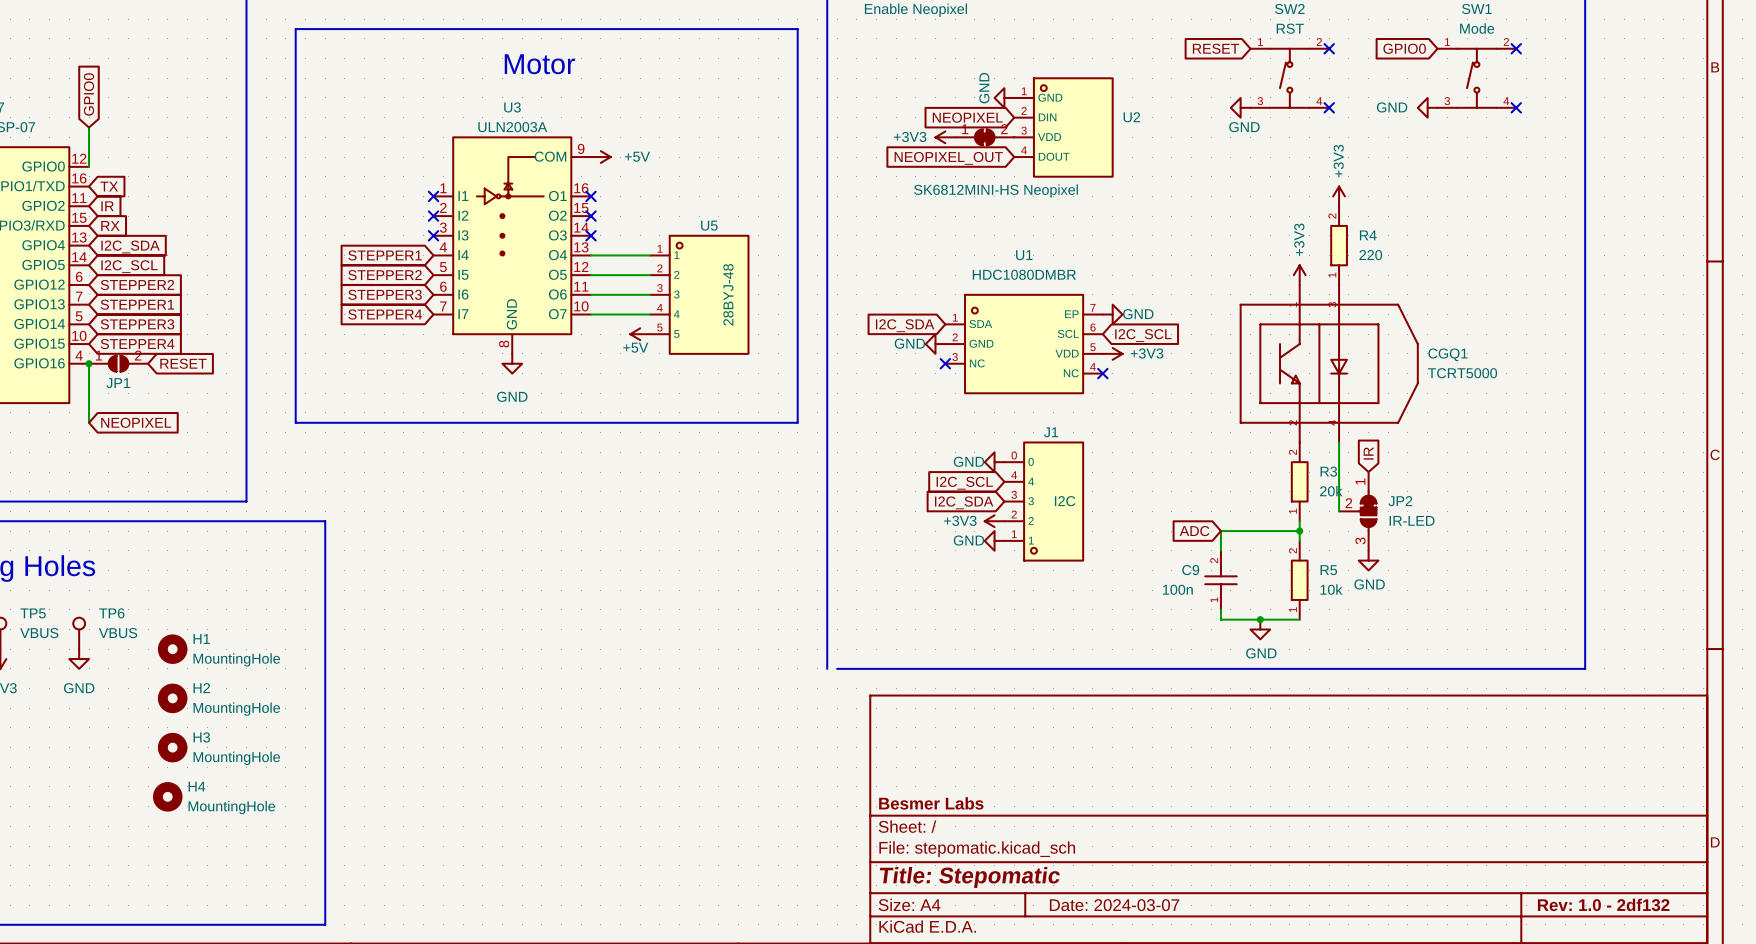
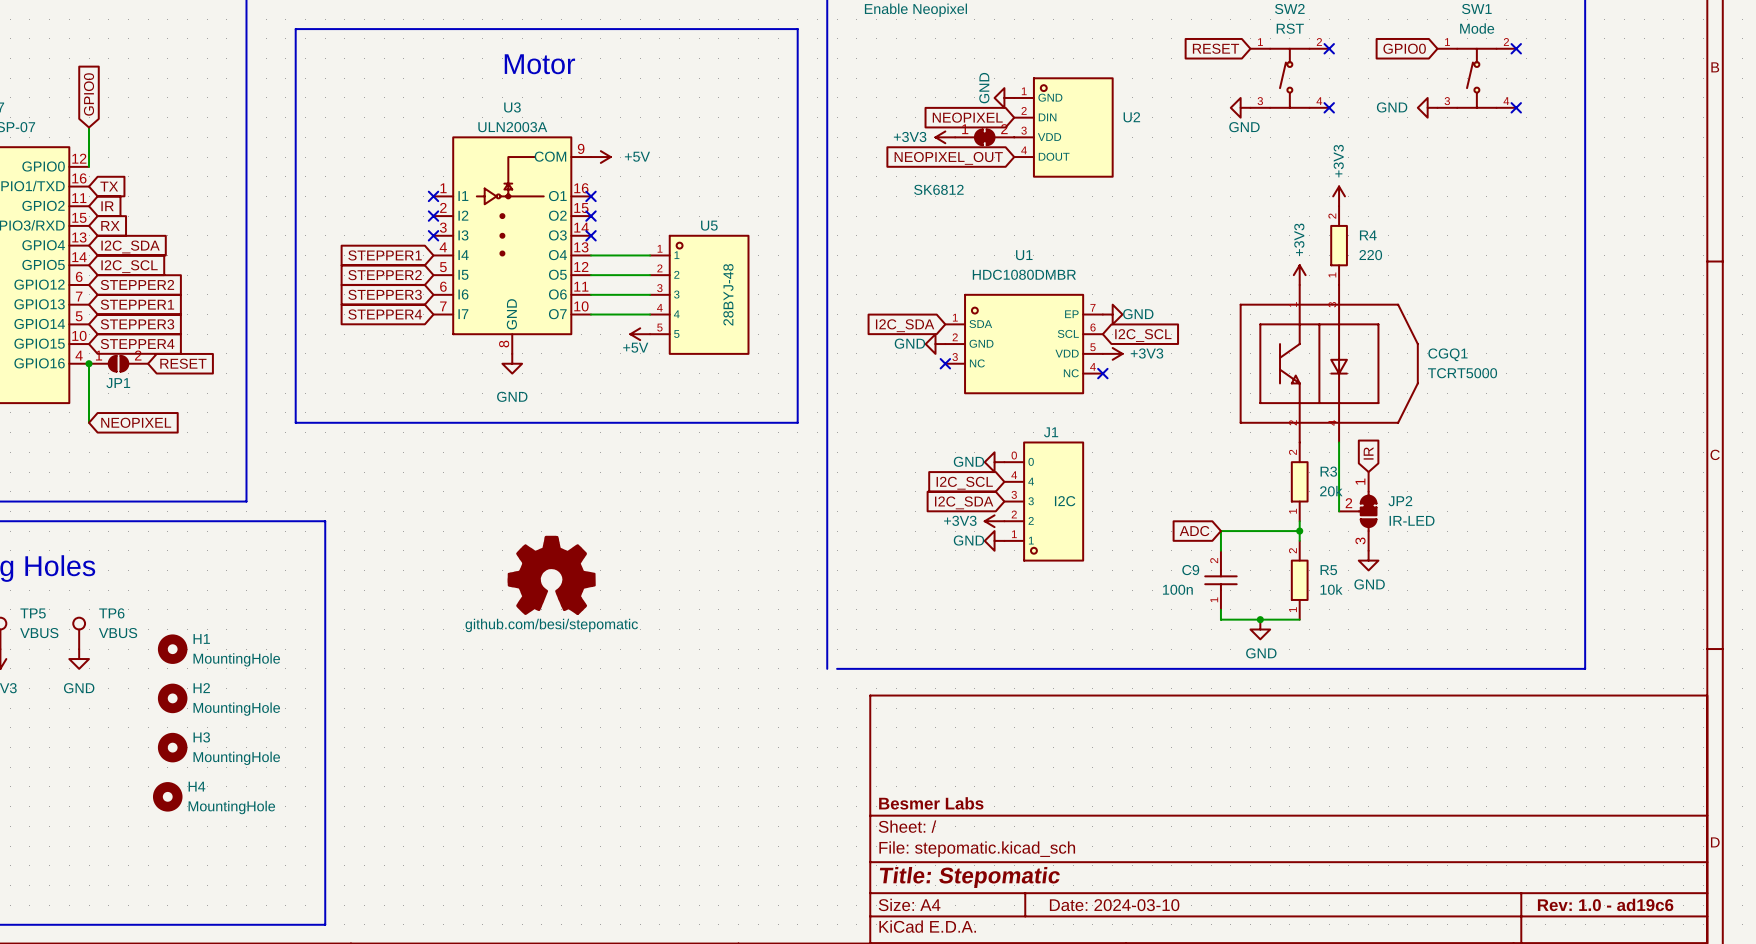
U2 value: SK6812MINI-HS Neopixel (996, 191) -> SK6812 (938, 189)
part: none -> github.com/besi/stepomatic (551, 575)
title block: Rev: 1.0 - 2df132 (1603, 904) -> Rev: 1.0 - ad19c6 (1605, 904)
title block: Date: 2024-03-07 (1114, 905) -> Date: 2024-03-10 (1114, 905)

